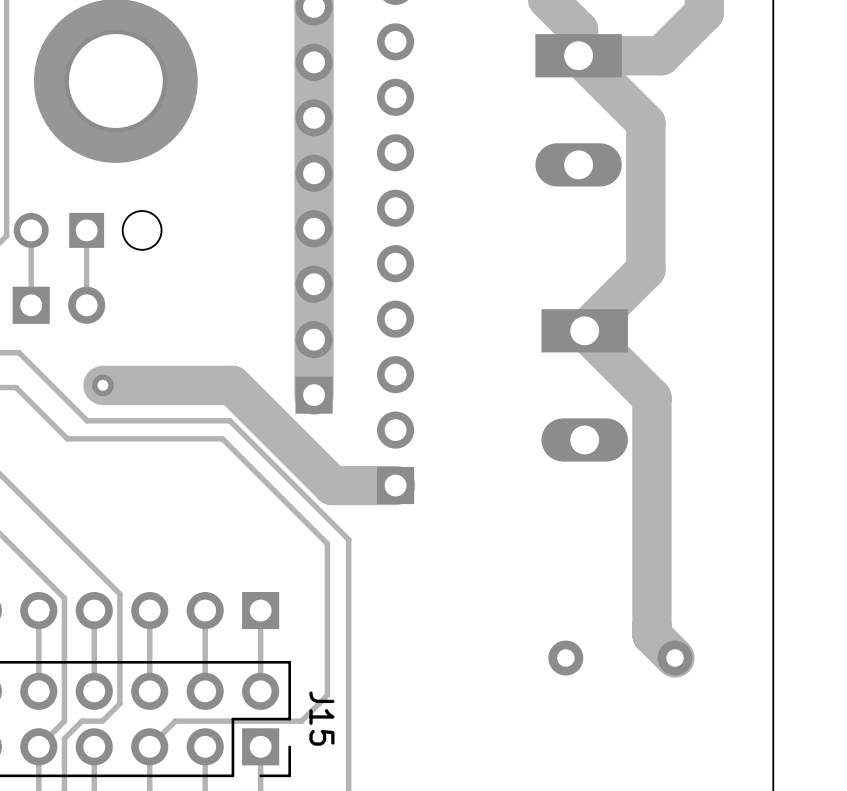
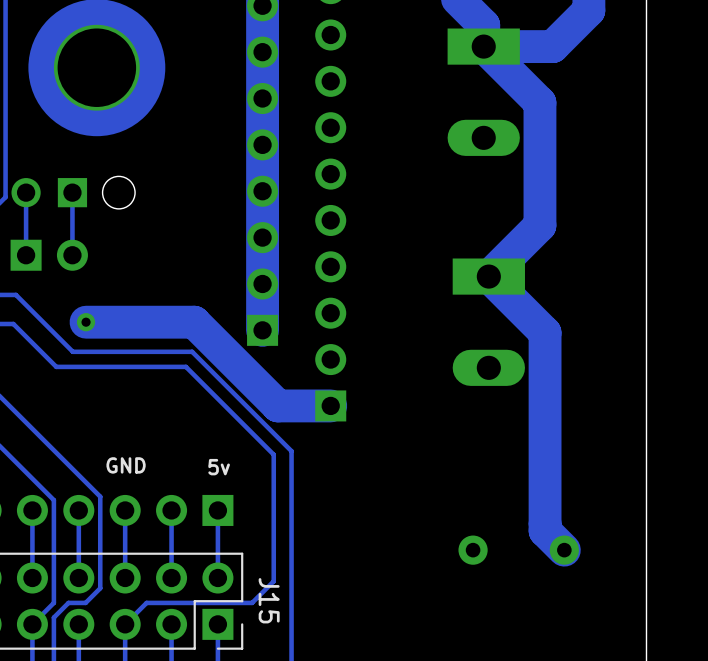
text: none -> GND (126, 465)
text: none -> 5v (219, 467)

